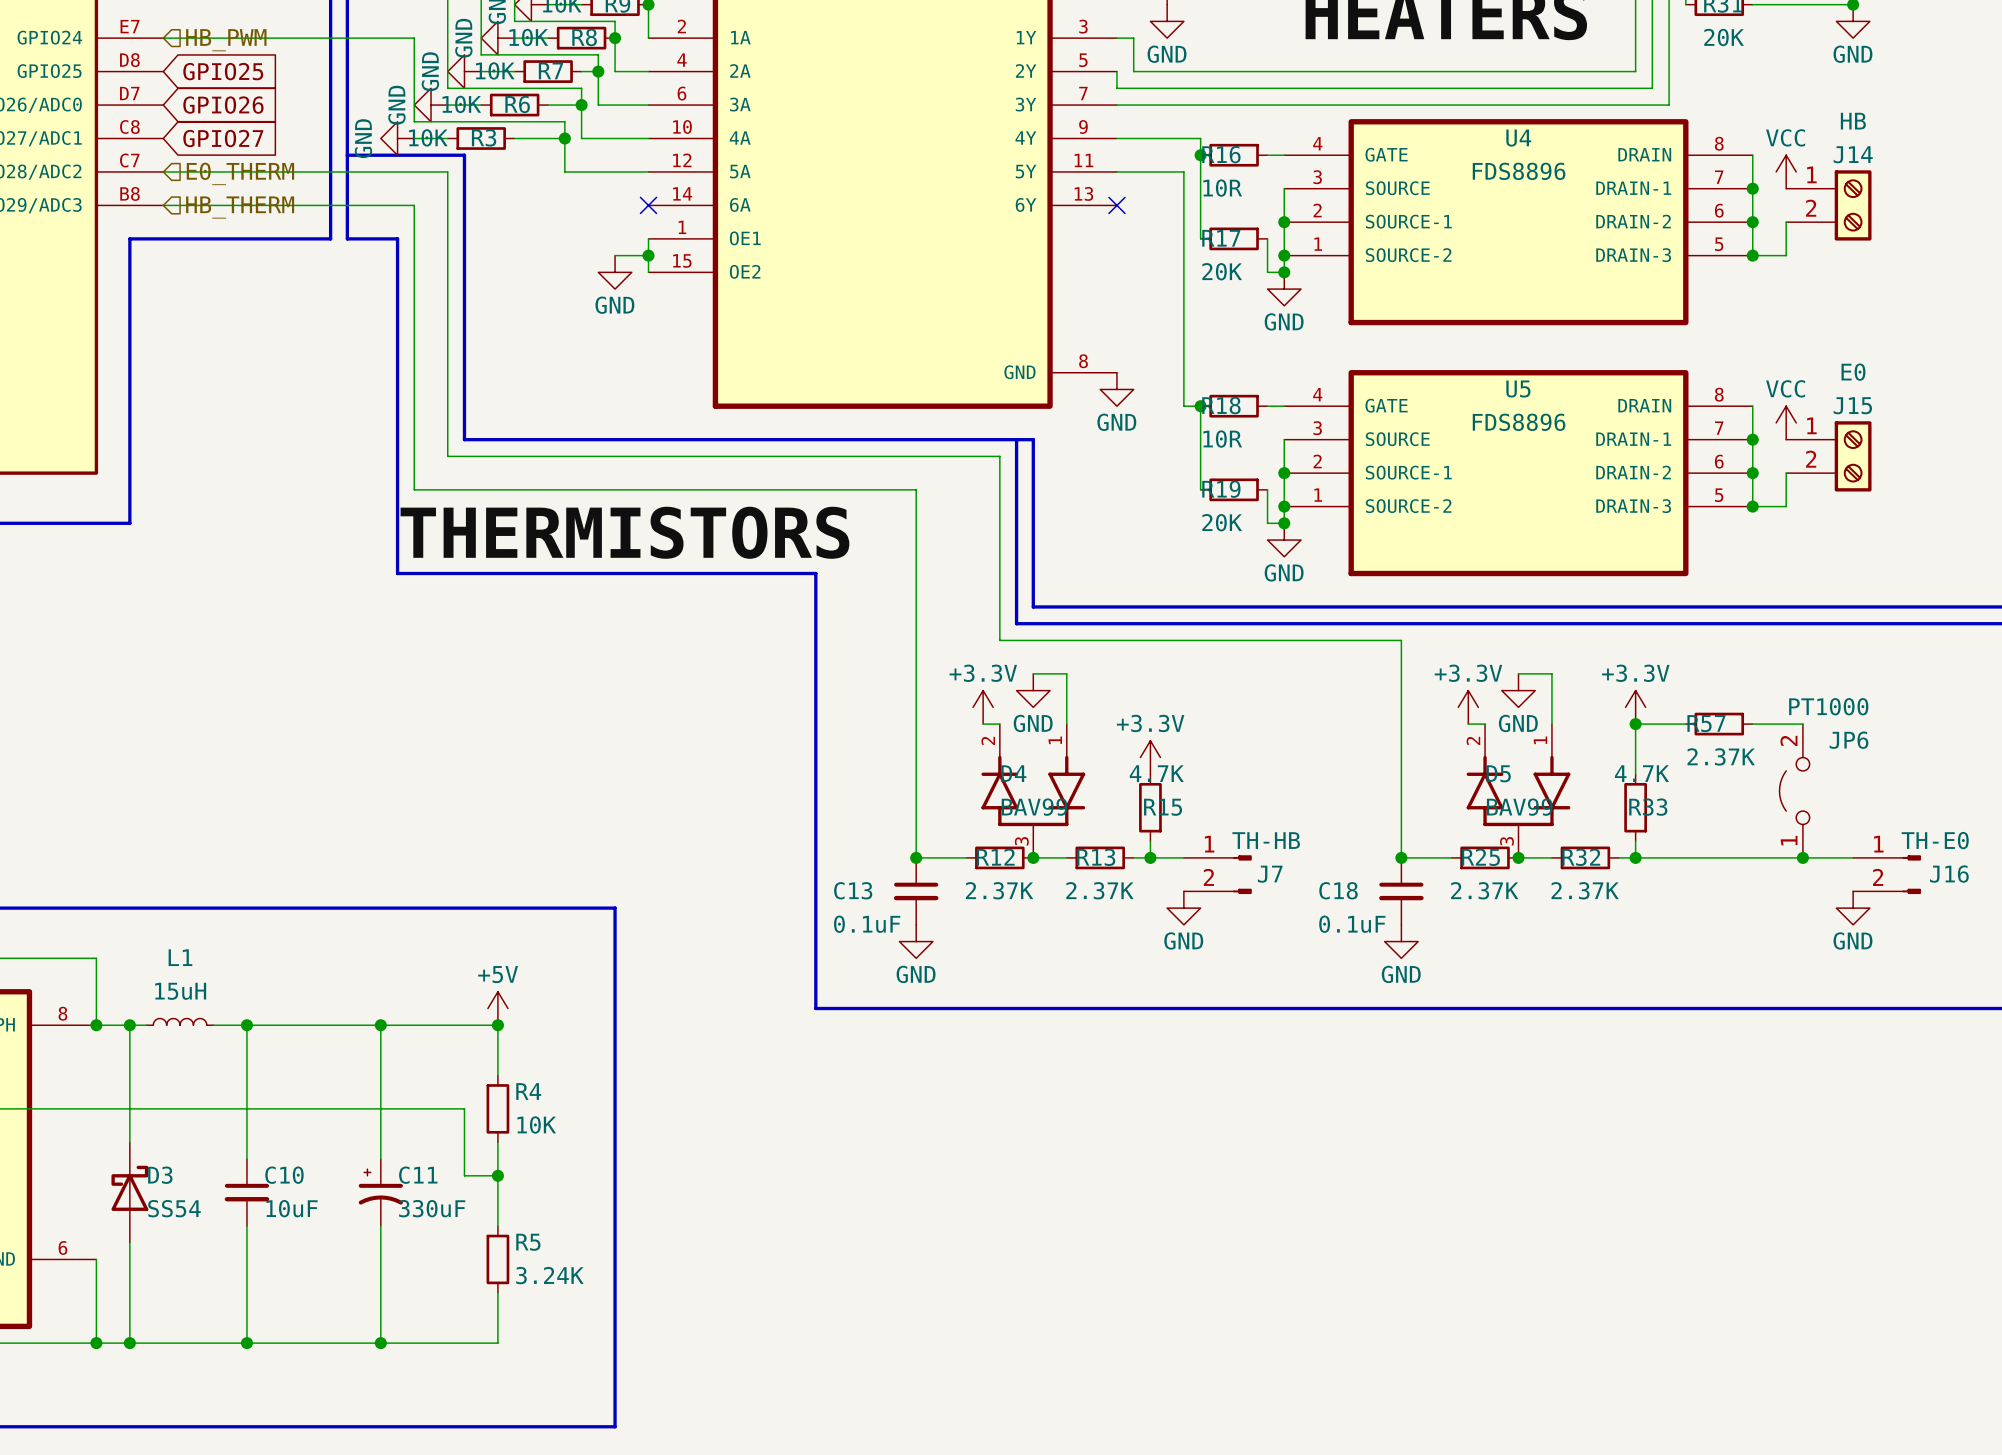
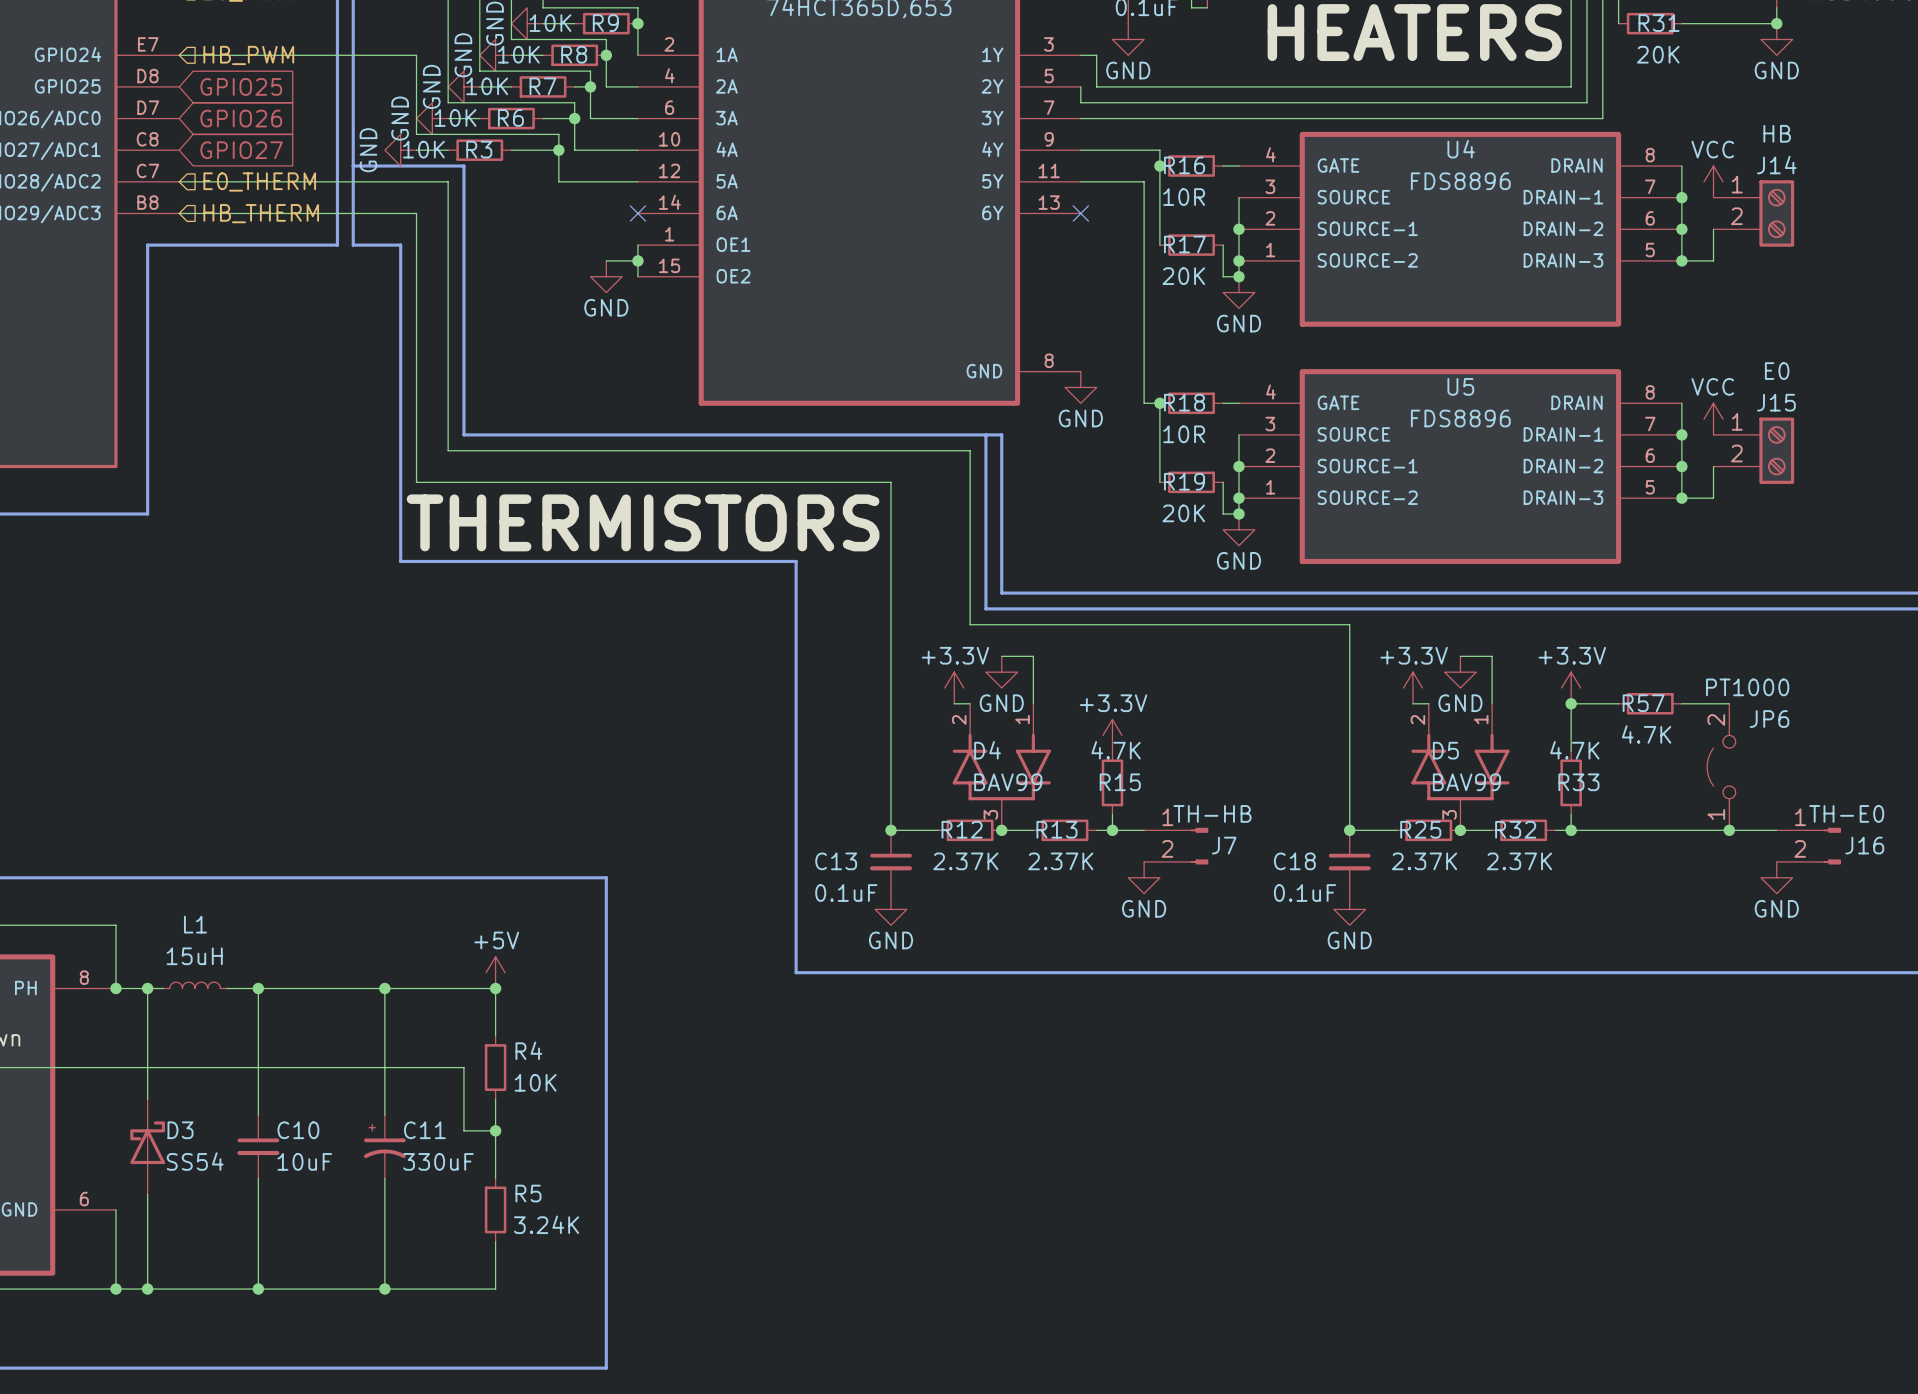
R57 value: 2.37K (1721, 756) -> 4.7K (1646, 734)

